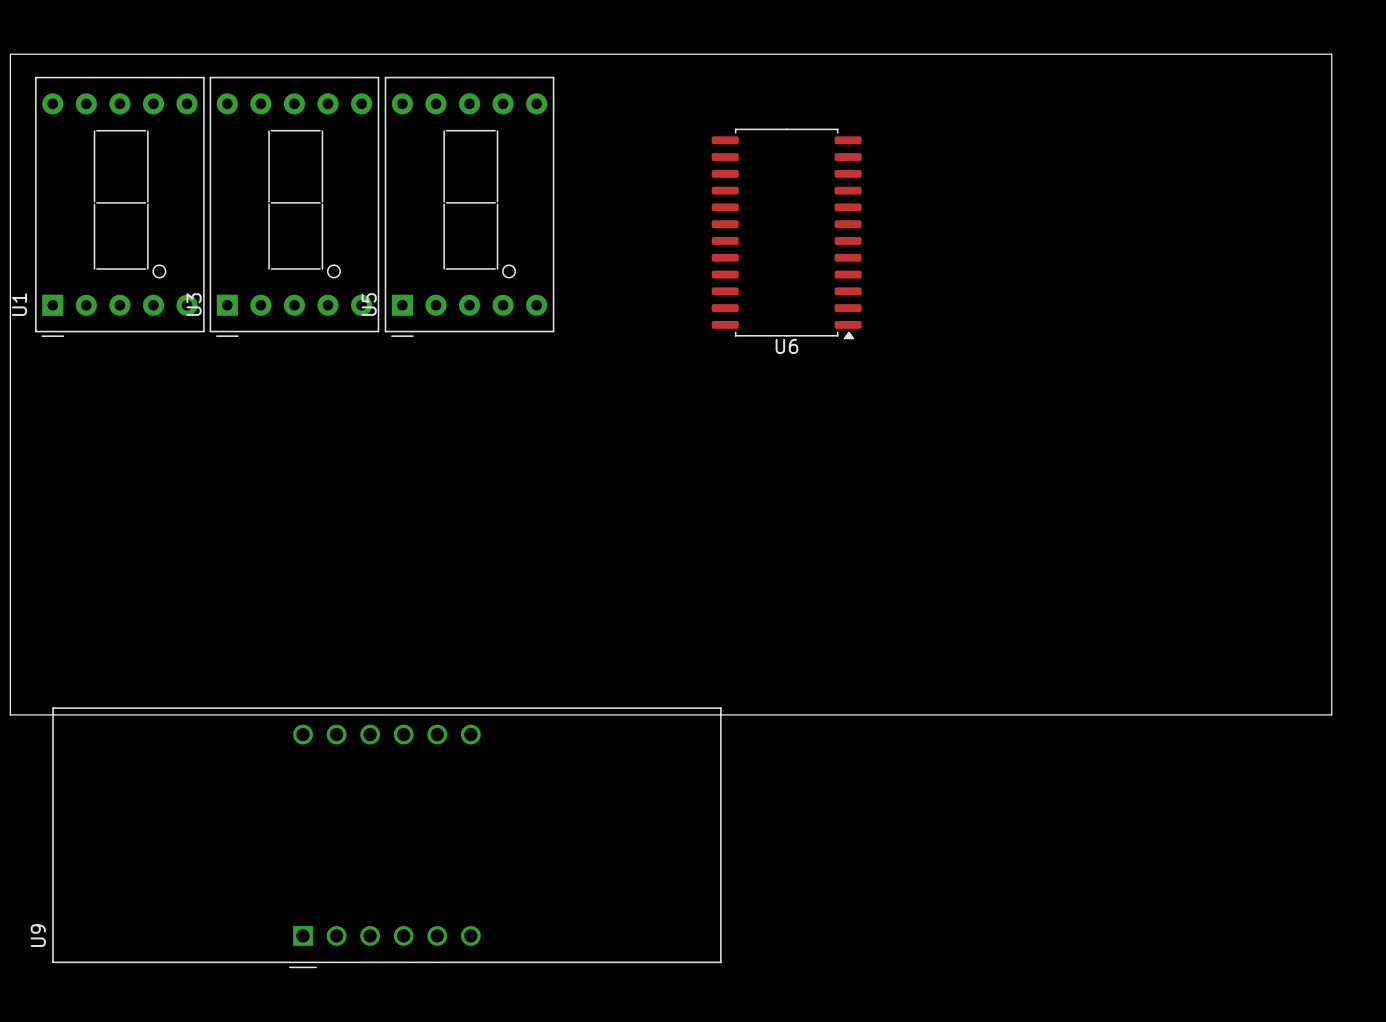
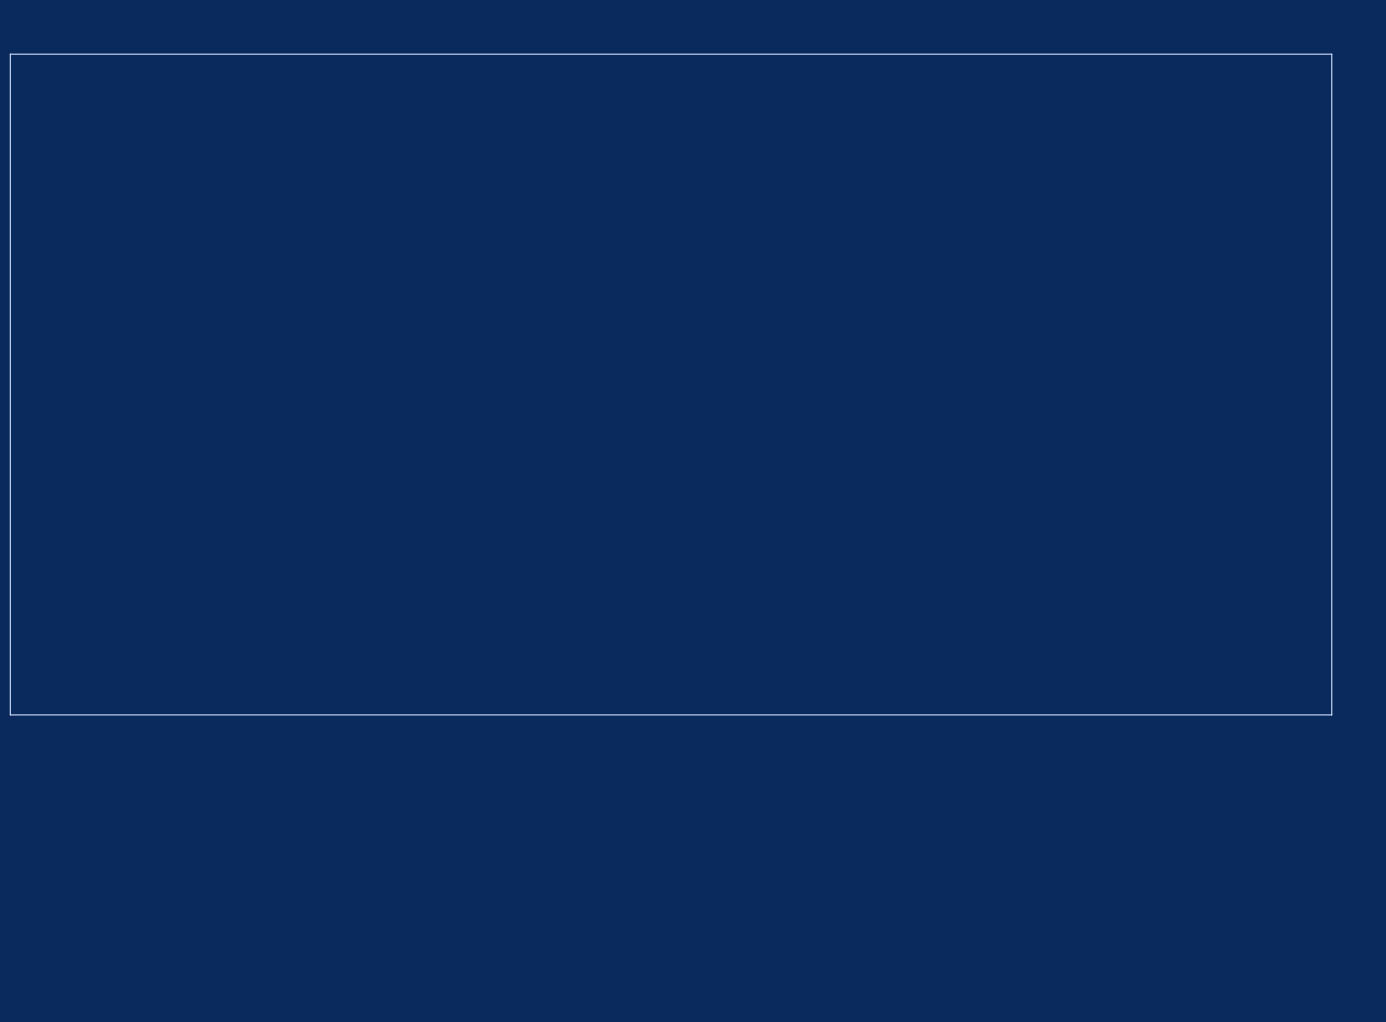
U1: (119, 206) -> none
U3: (294, 206) -> none
U5: (469, 206) -> none
U6: (786, 233) -> none
U9: (386, 837) -> none

